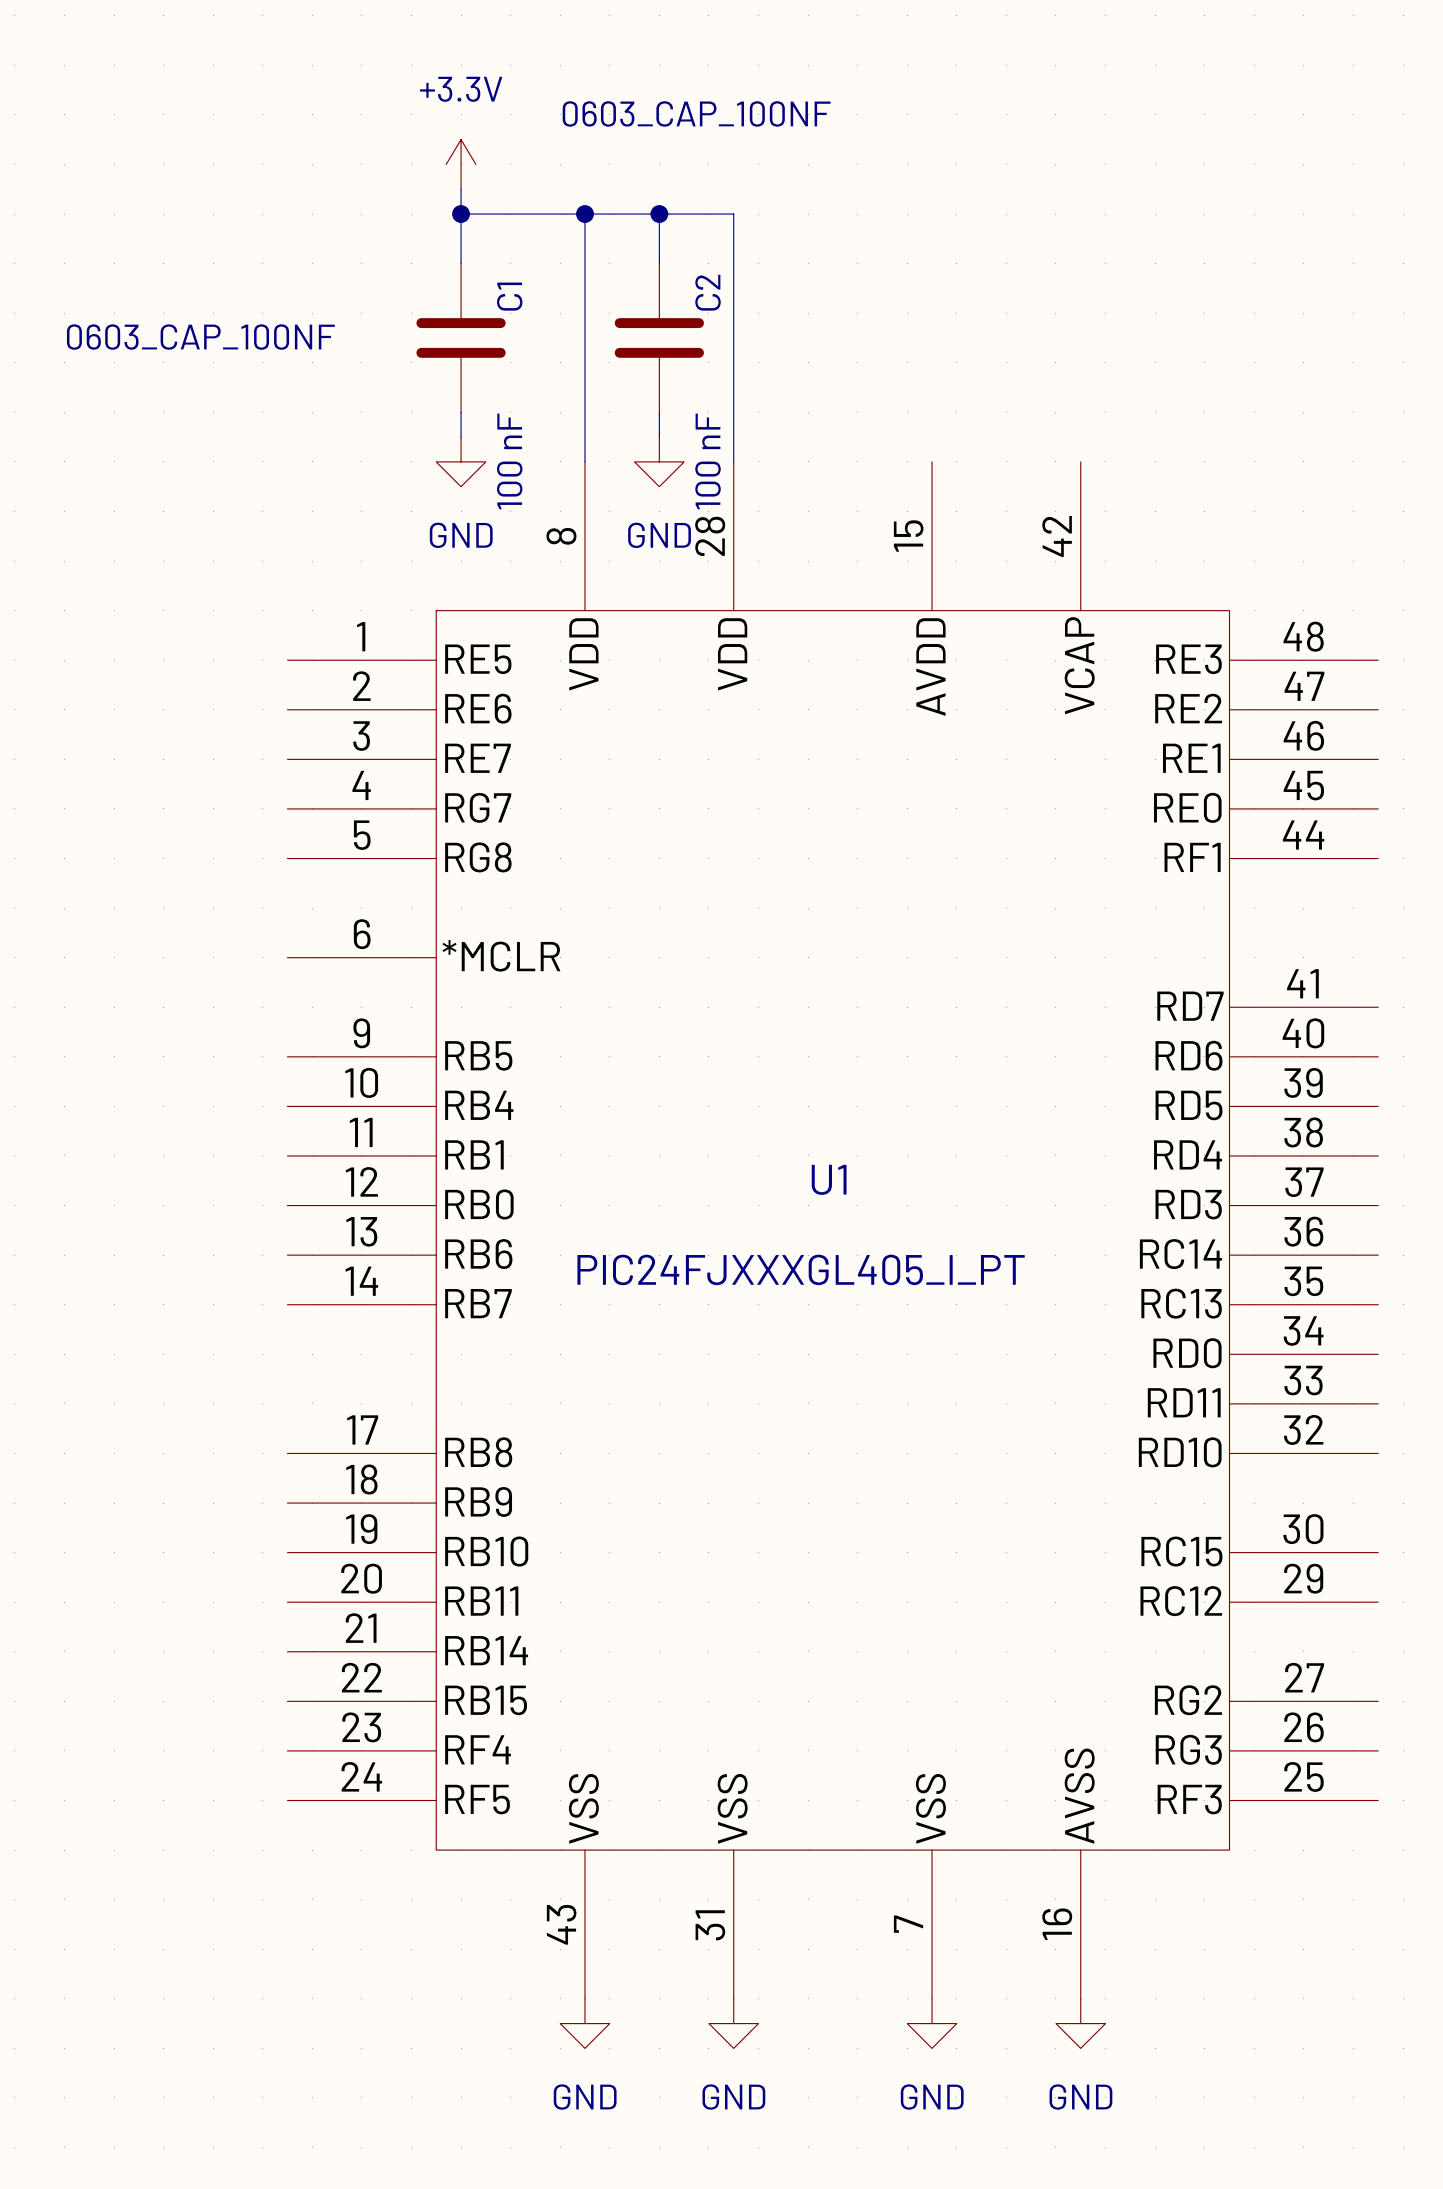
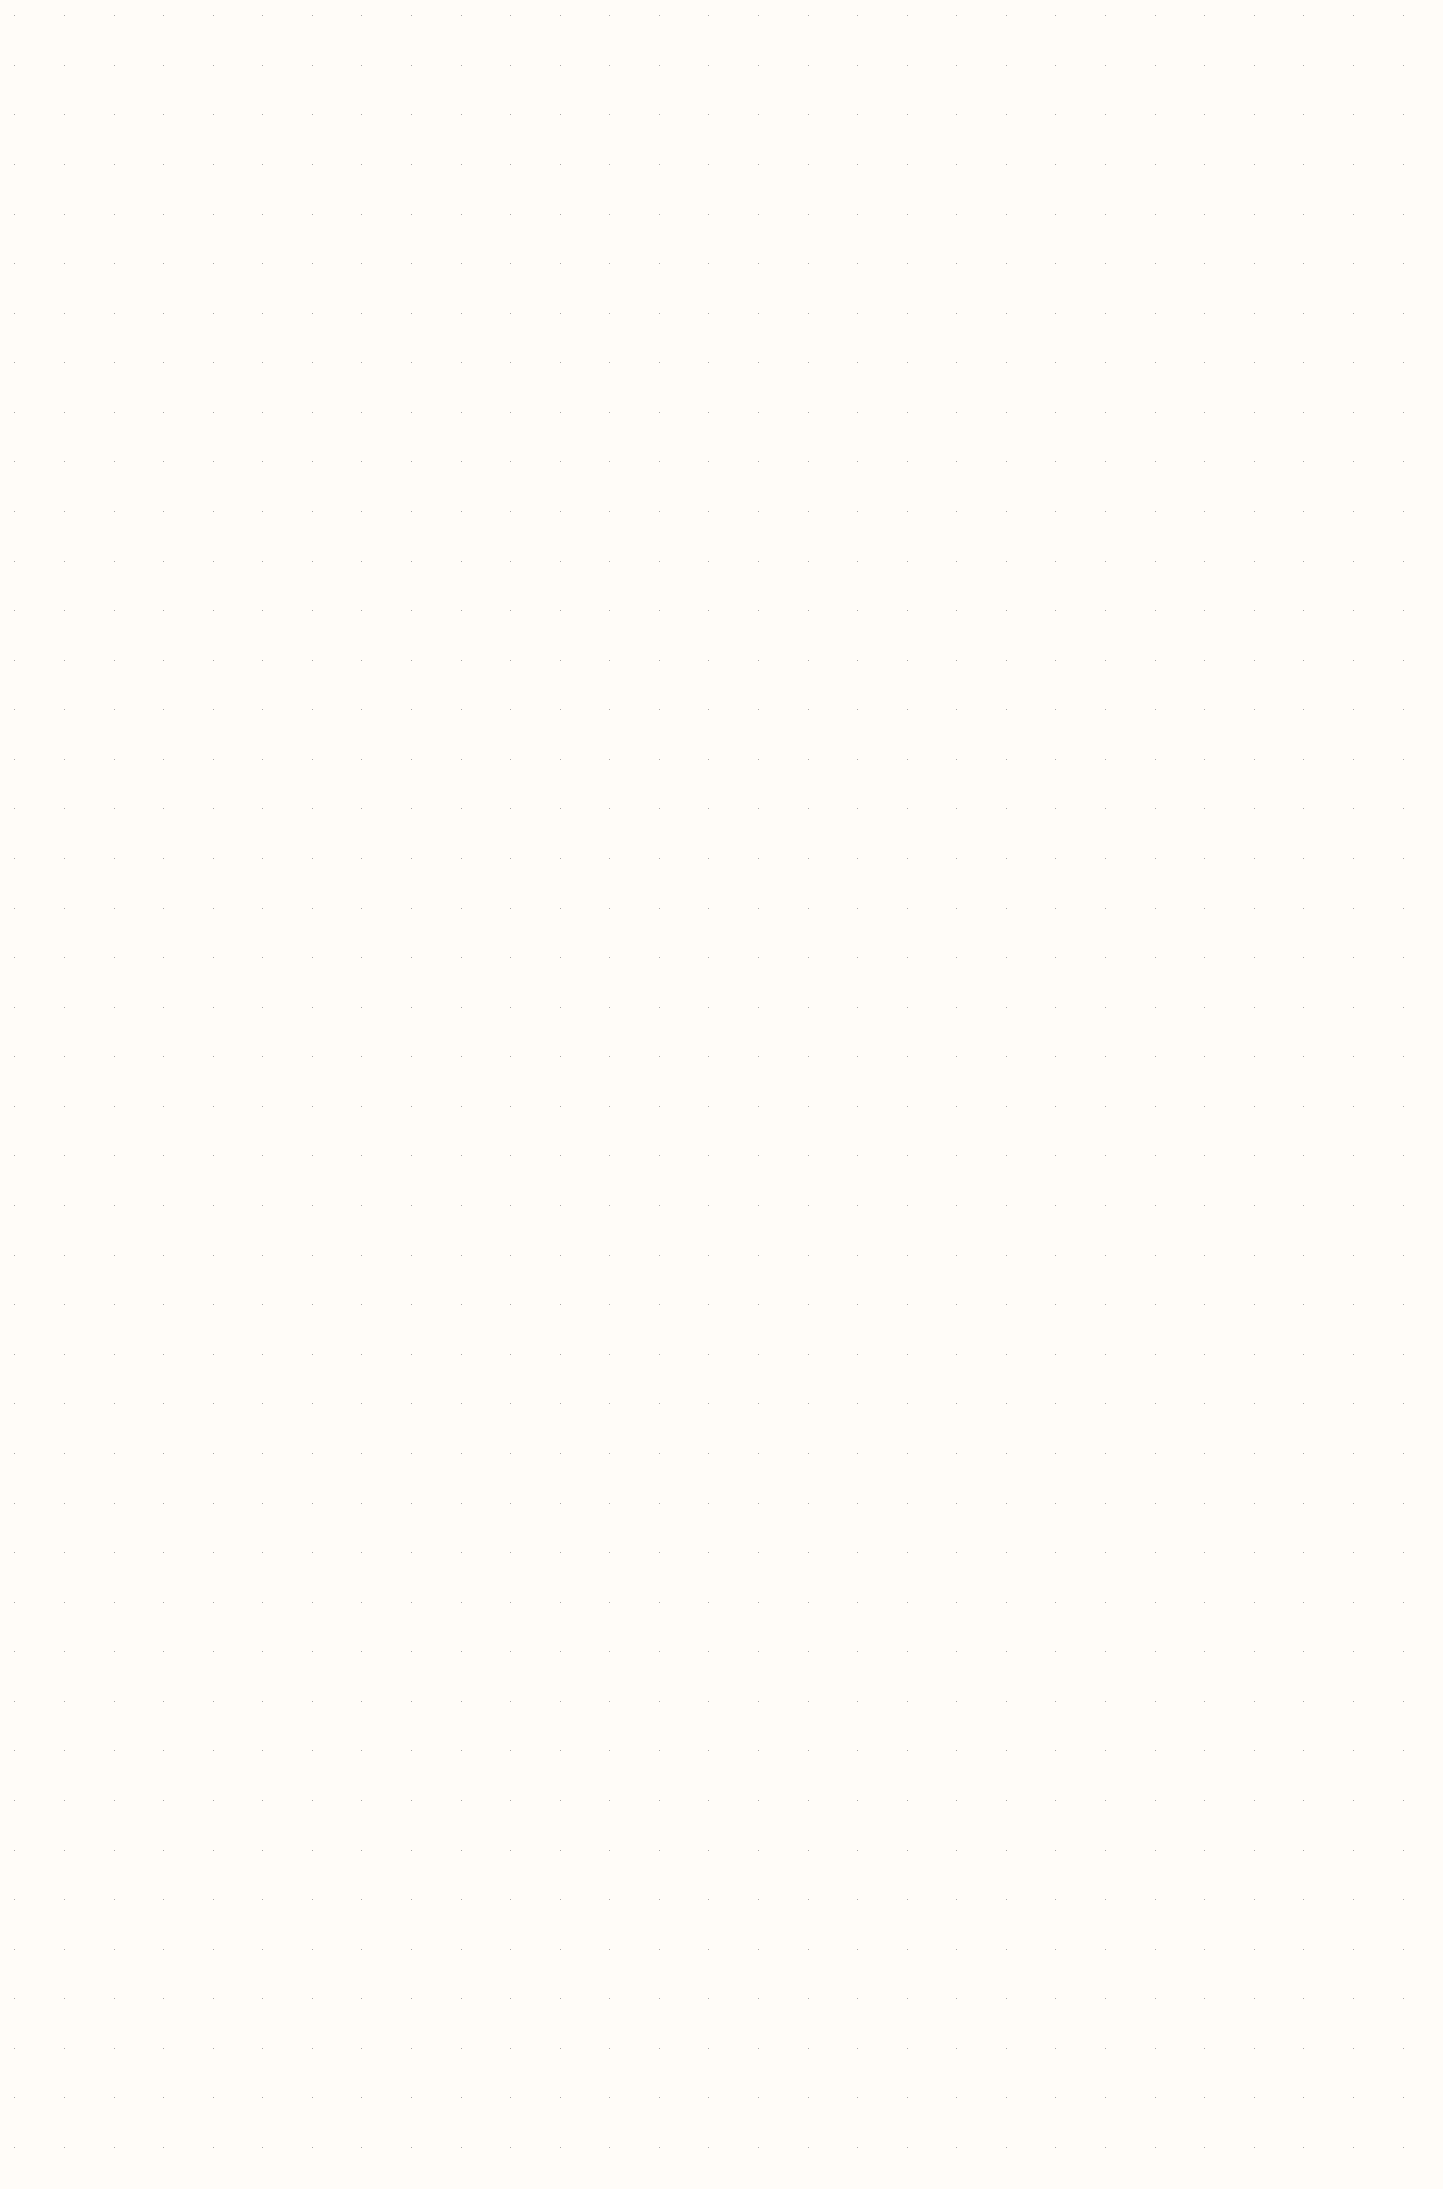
power symbol: +3.3V (461, 164) -> none
wire: (461, 189) (461, 263) -> none
wire: (461, 214) (733, 214) (733, 461) -> none
junction: (461, 214) -> none
wire: (584, 214) (584, 461) -> none
junction: (584, 214) -> none
wire: (659, 214) (659, 263) -> none
junction: (659, 214) -> none
C1: 100 nF (461, 337) -> none
C2: 100 nF (659, 337) -> none
wire: (461, 412) (461, 437) -> none
wire: (659, 412) (659, 437) -> none
power symbol: GND (461, 461) -> none
power symbol: GND (659, 461) -> none
U1: PIC24FJXXXGL405_I_PT (832, 1230) -> none
power symbol: GND (584, 2023) -> none
power symbol: GND (733, 2023) -> none
power symbol: GND (932, 2023) -> none
power symbol: GND (1080, 2023) -> none

